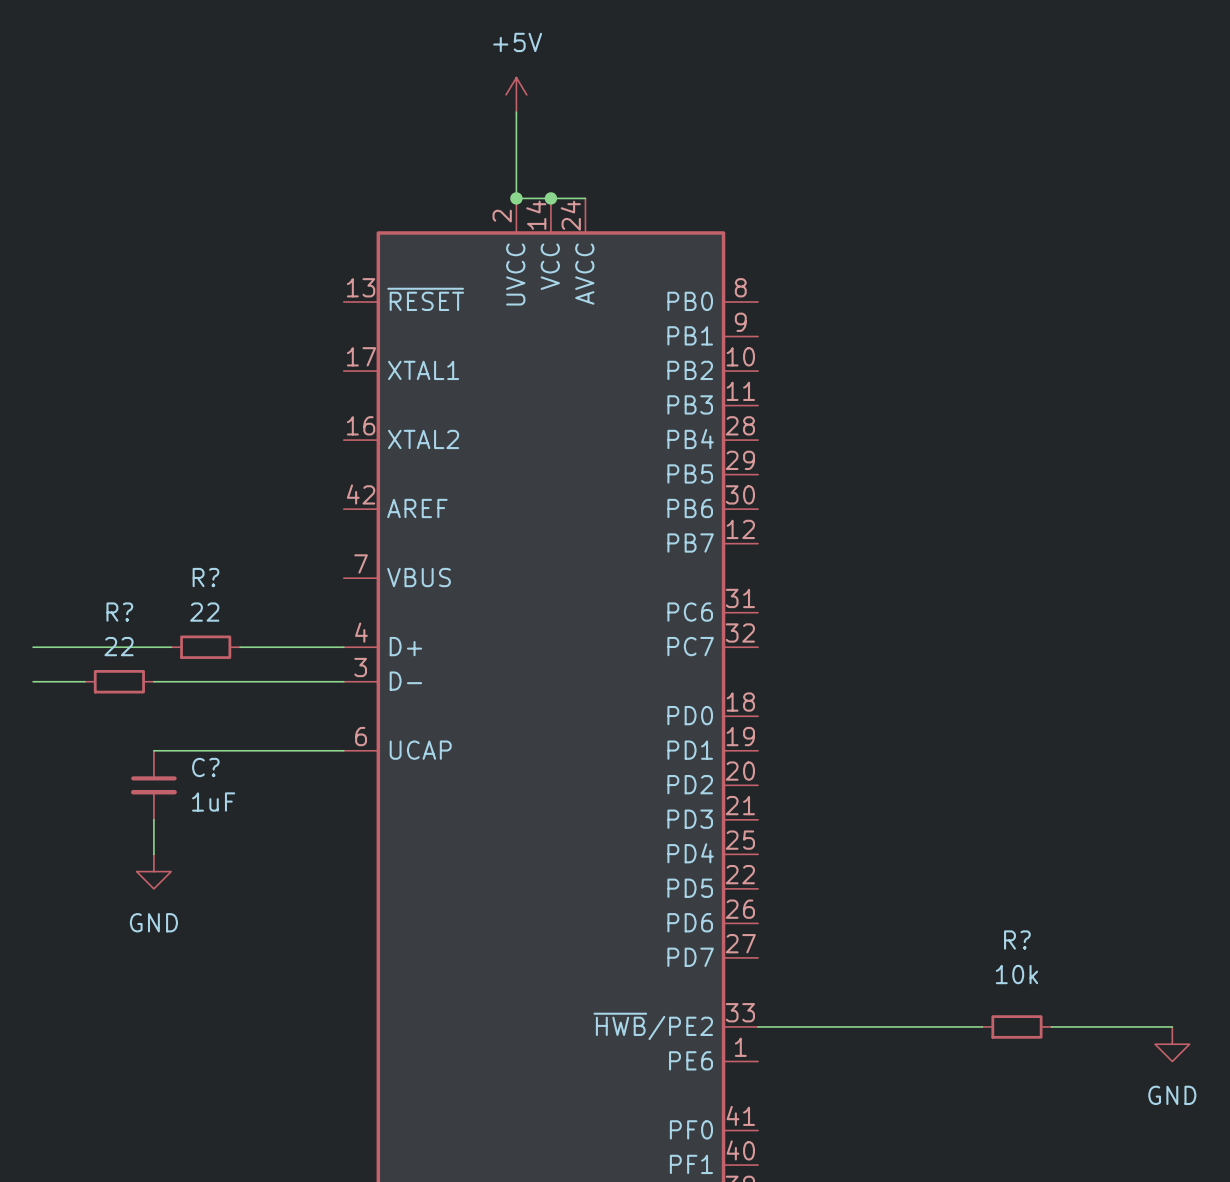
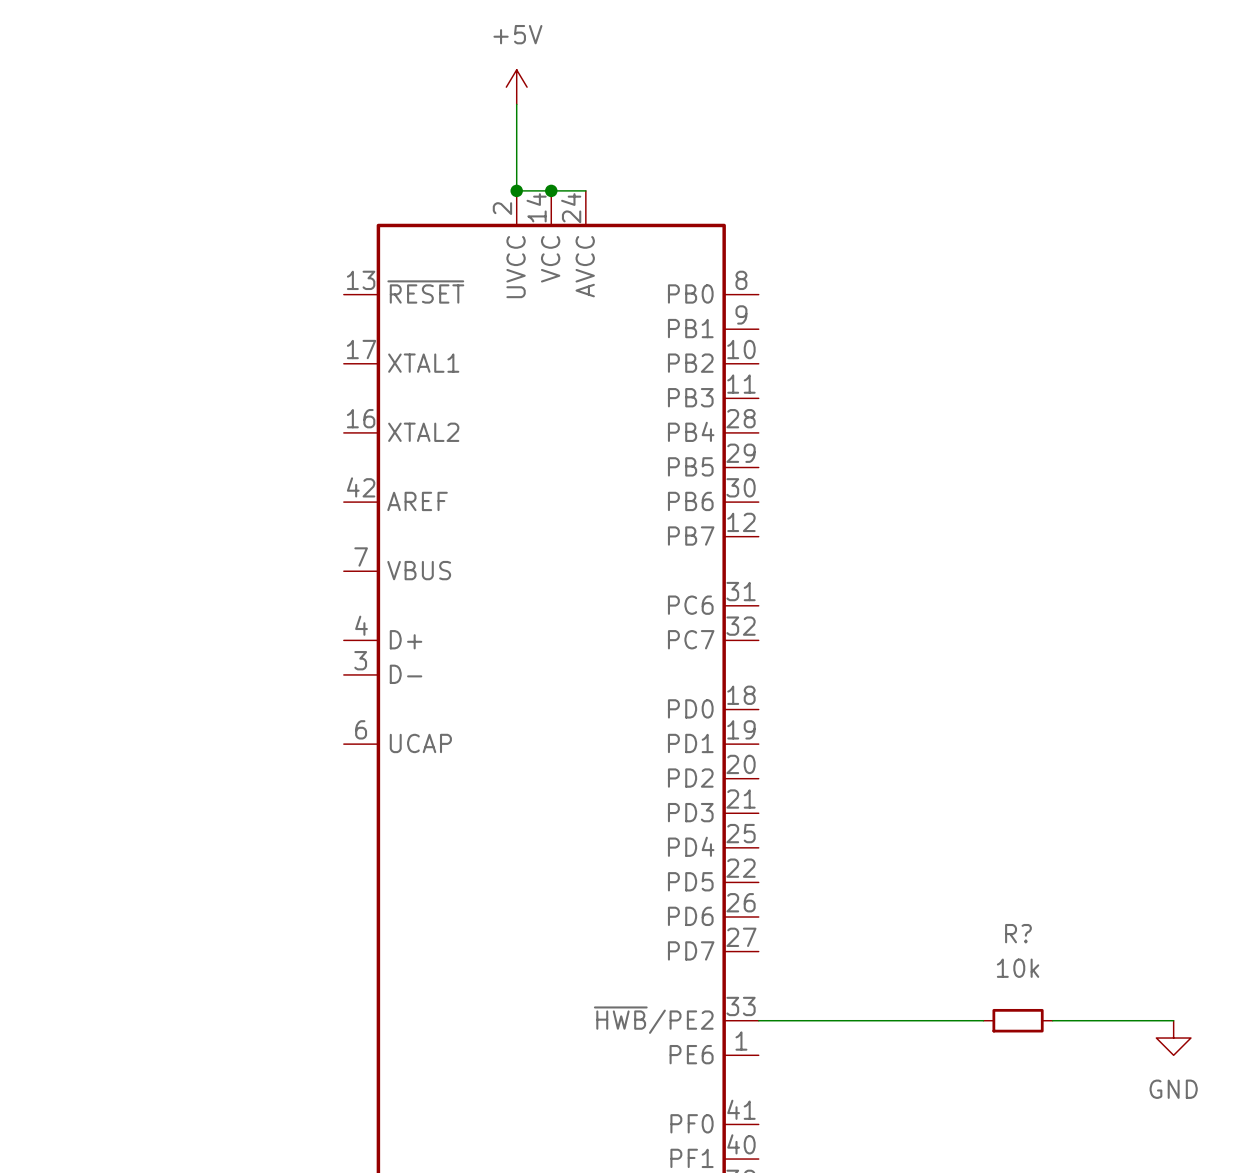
wire: (33, 647) (171, 647) -> none
R?: 22 (205, 647) -> none
wire: (240, 647) (343, 647) -> none
wire: (33, 681) (84, 681) -> none
R?: 22 (119, 681) -> none
wire: (153, 681) (343, 681) -> none
wire: (153, 750) (343, 750) -> none
C?: 1uF (153, 785) -> none
wire: (153, 819) (153, 854) -> none
power symbol: GND (153, 871) -> none

